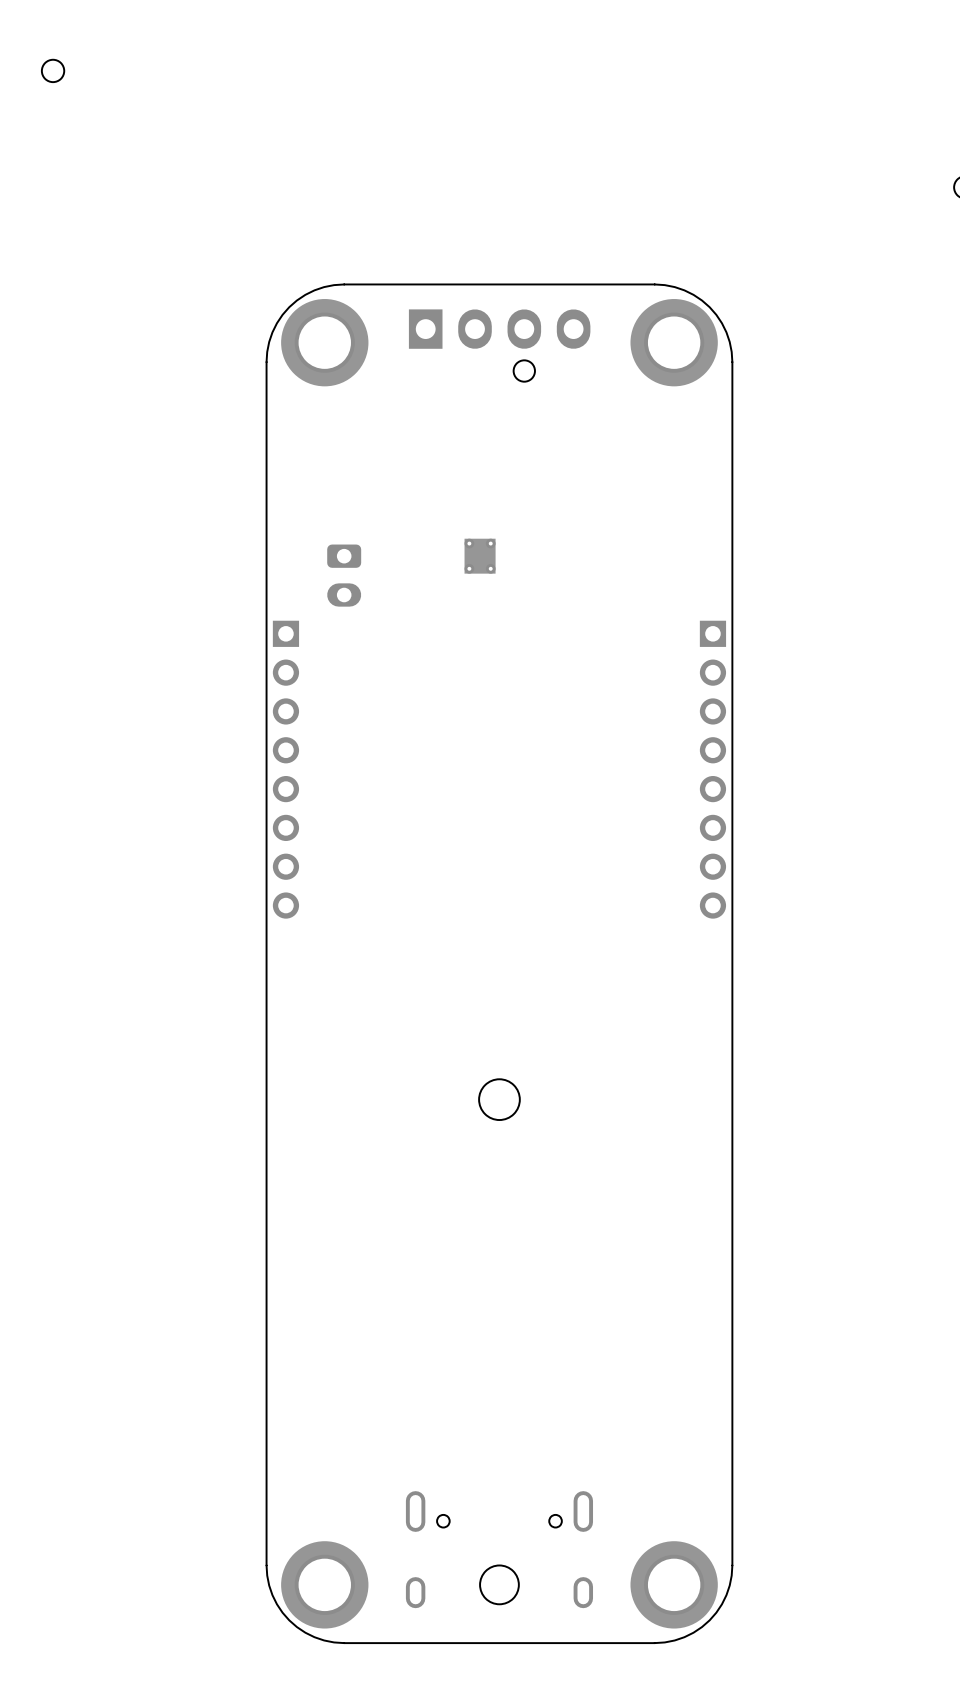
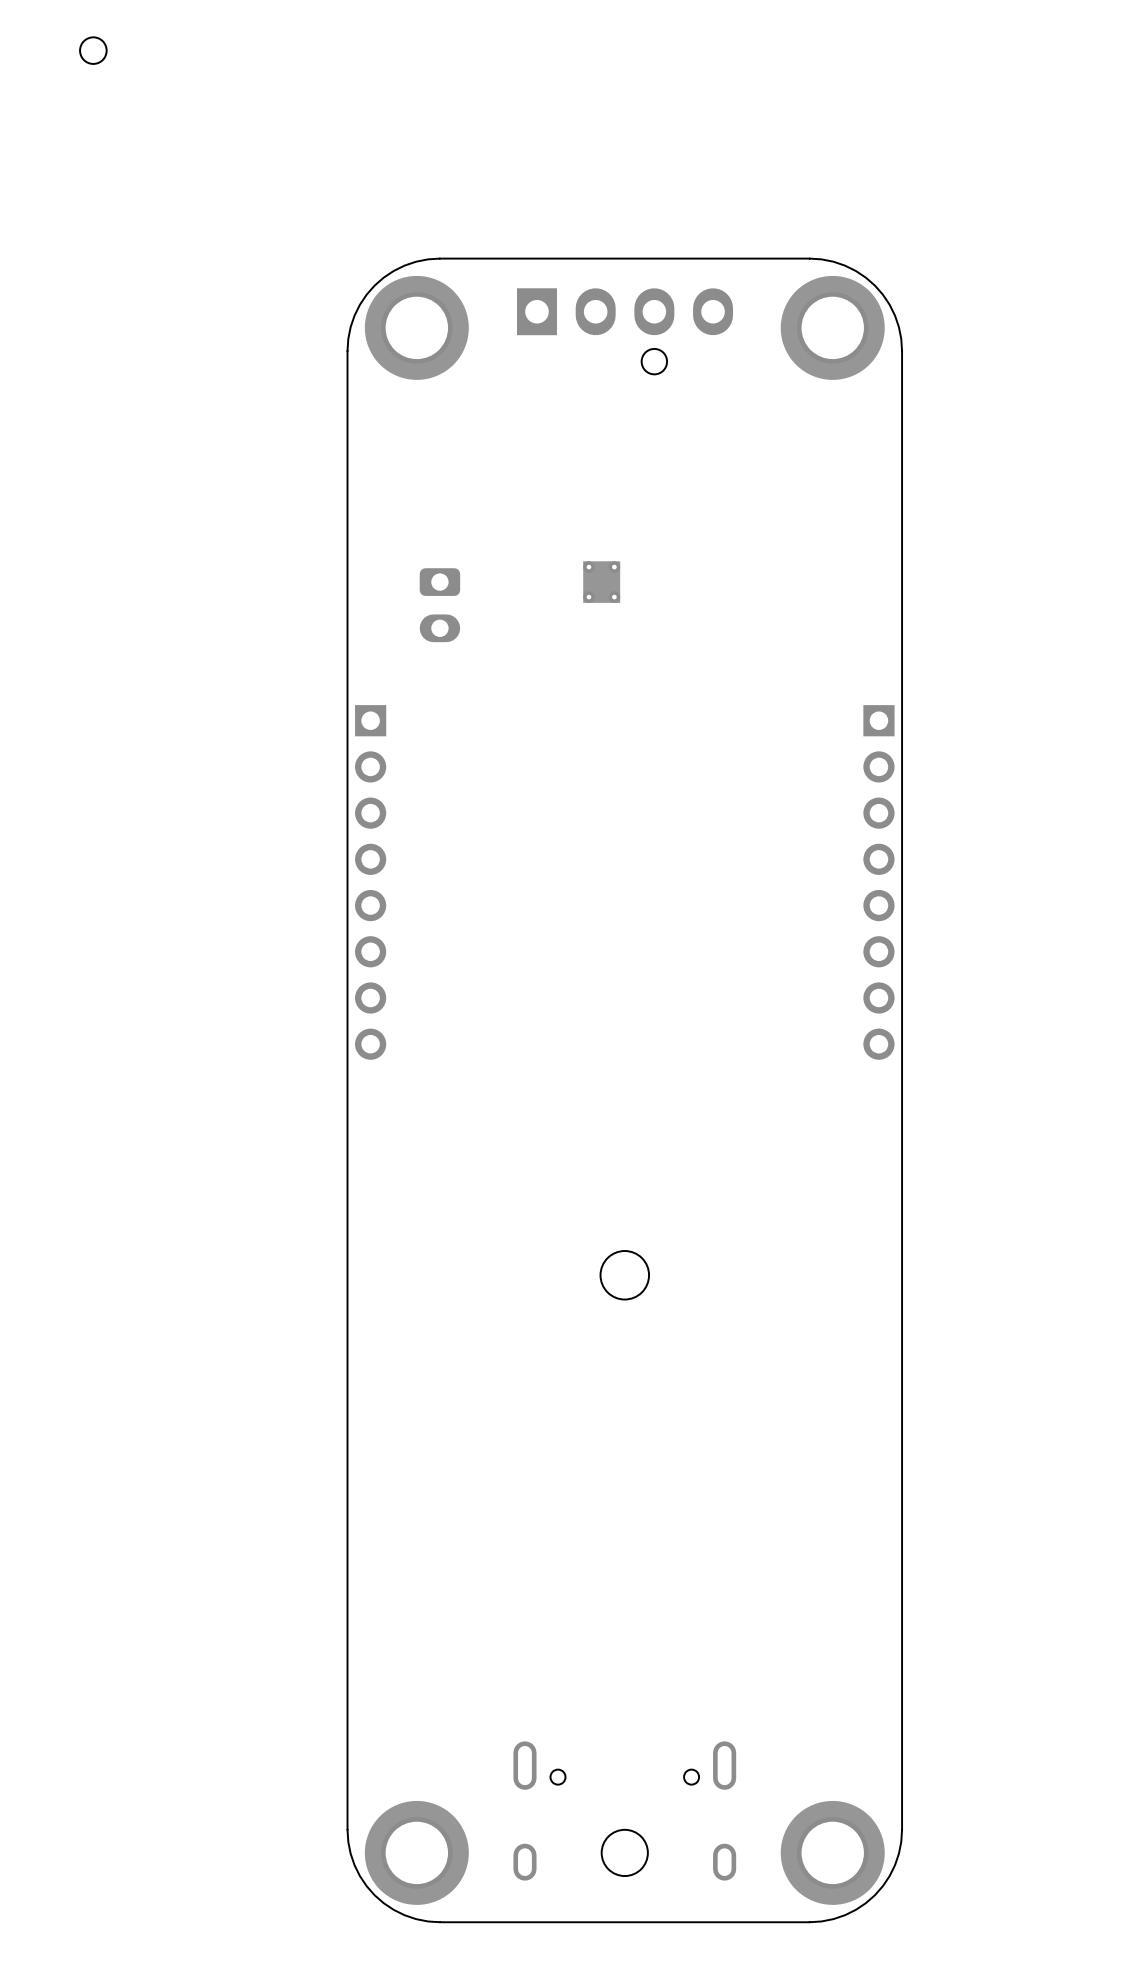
part position: (324, 342) -> (416, 327)
part position: (674, 342) -> (832, 327)
part position: (499, 345) -> (625, 331)
board edge: (732, 362) (726, 332) (709, 307) (684, 290) (654, 284) (344, 284) (324, 287) (296, 300) (282, 314) (272, 332) (266, 362) -> (902, 397) (901, 338) (895, 315) (889, 304) (874, 285) (855, 270) (833, 261) (809, 258) (439, 258) (416, 261) (393, 270) (383, 277) (374, 285) (359, 304) (350, 327) (348, 338) (347, 397)
part position: (480, 556) -> (601, 582)
part position: (344, 575) -> (439, 605)

